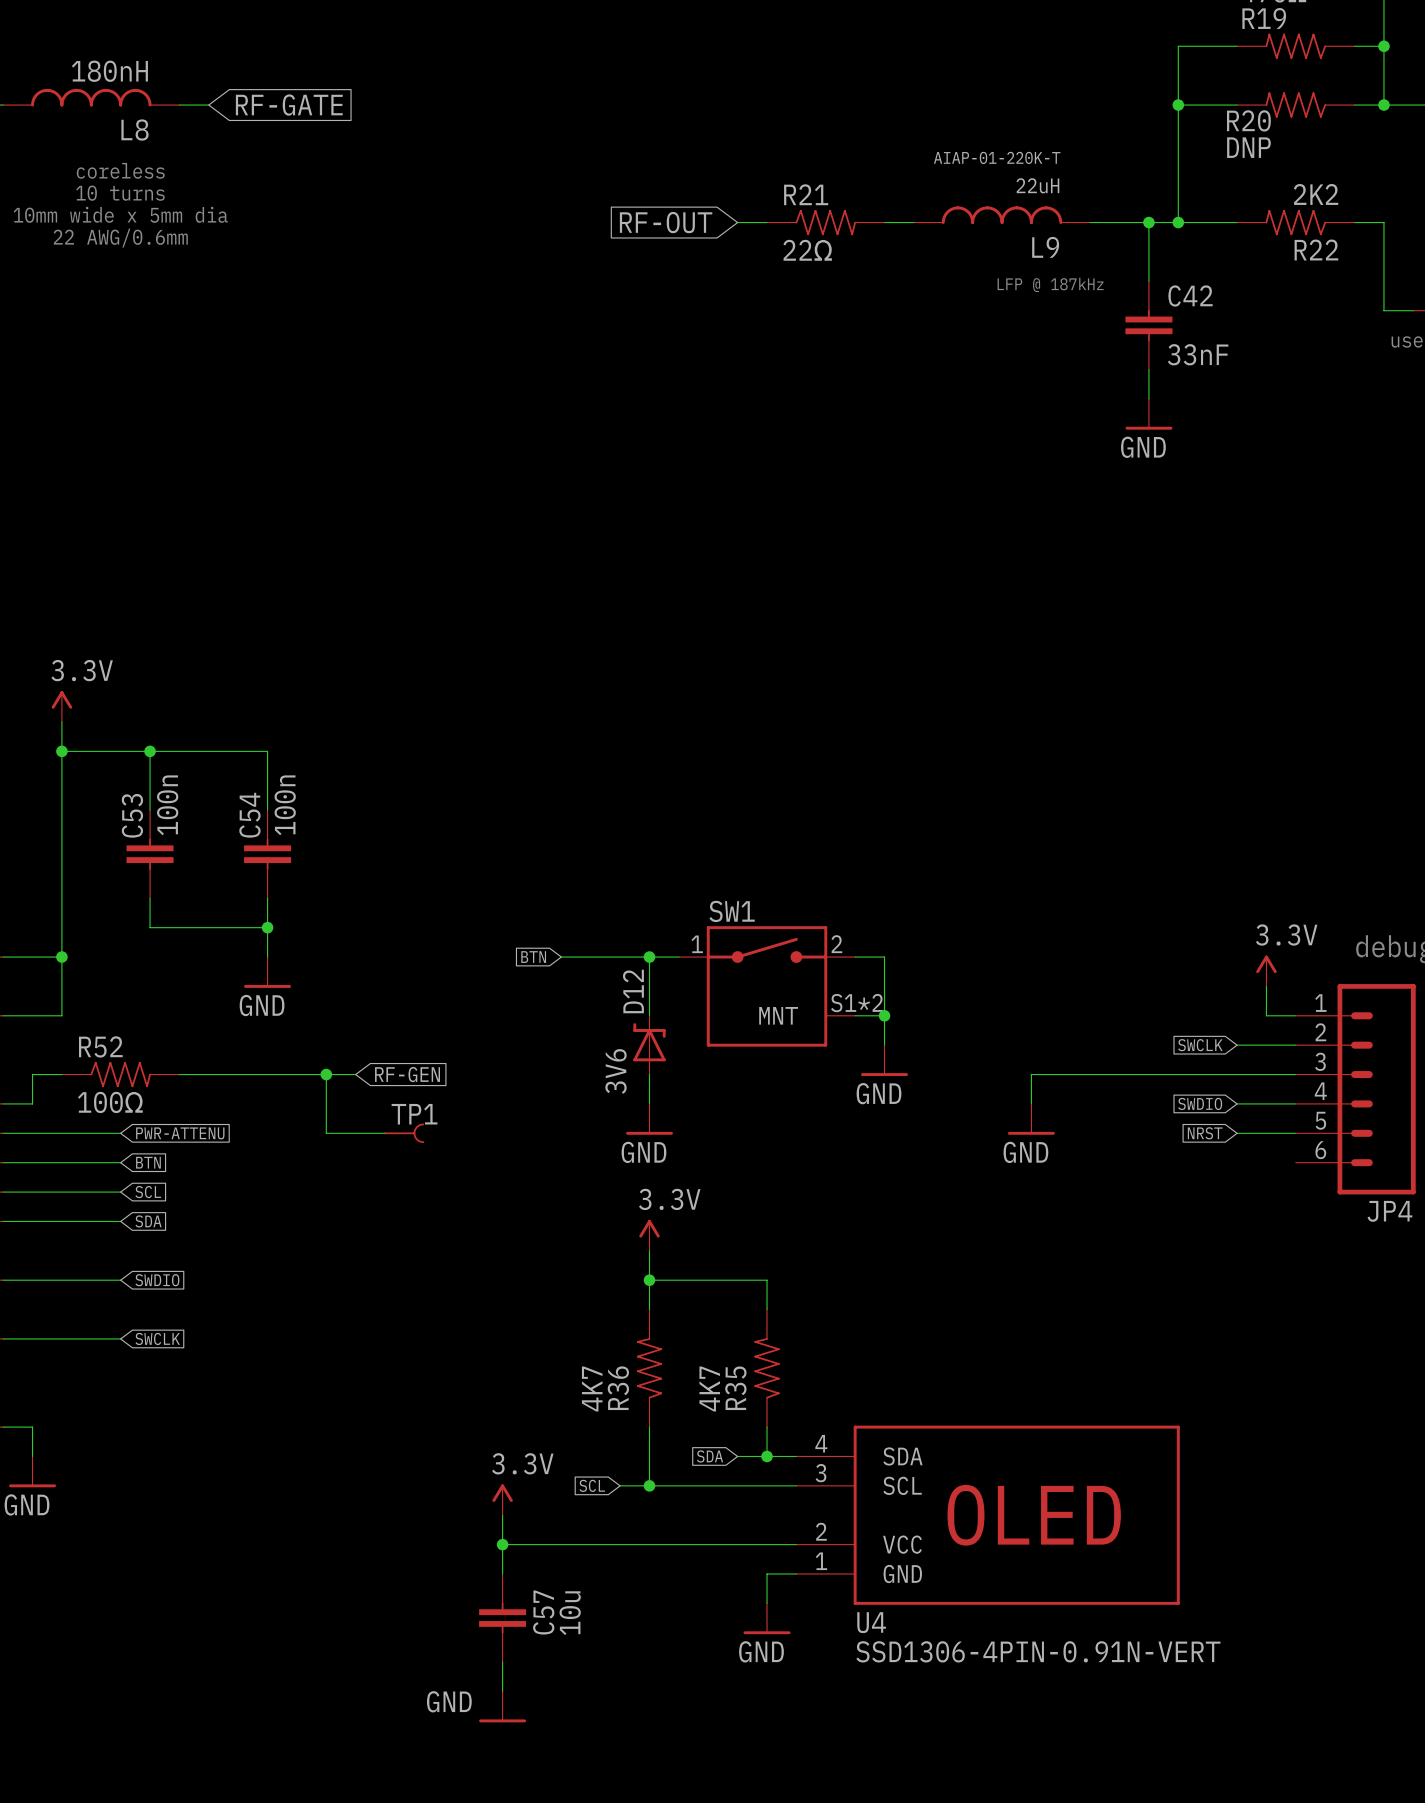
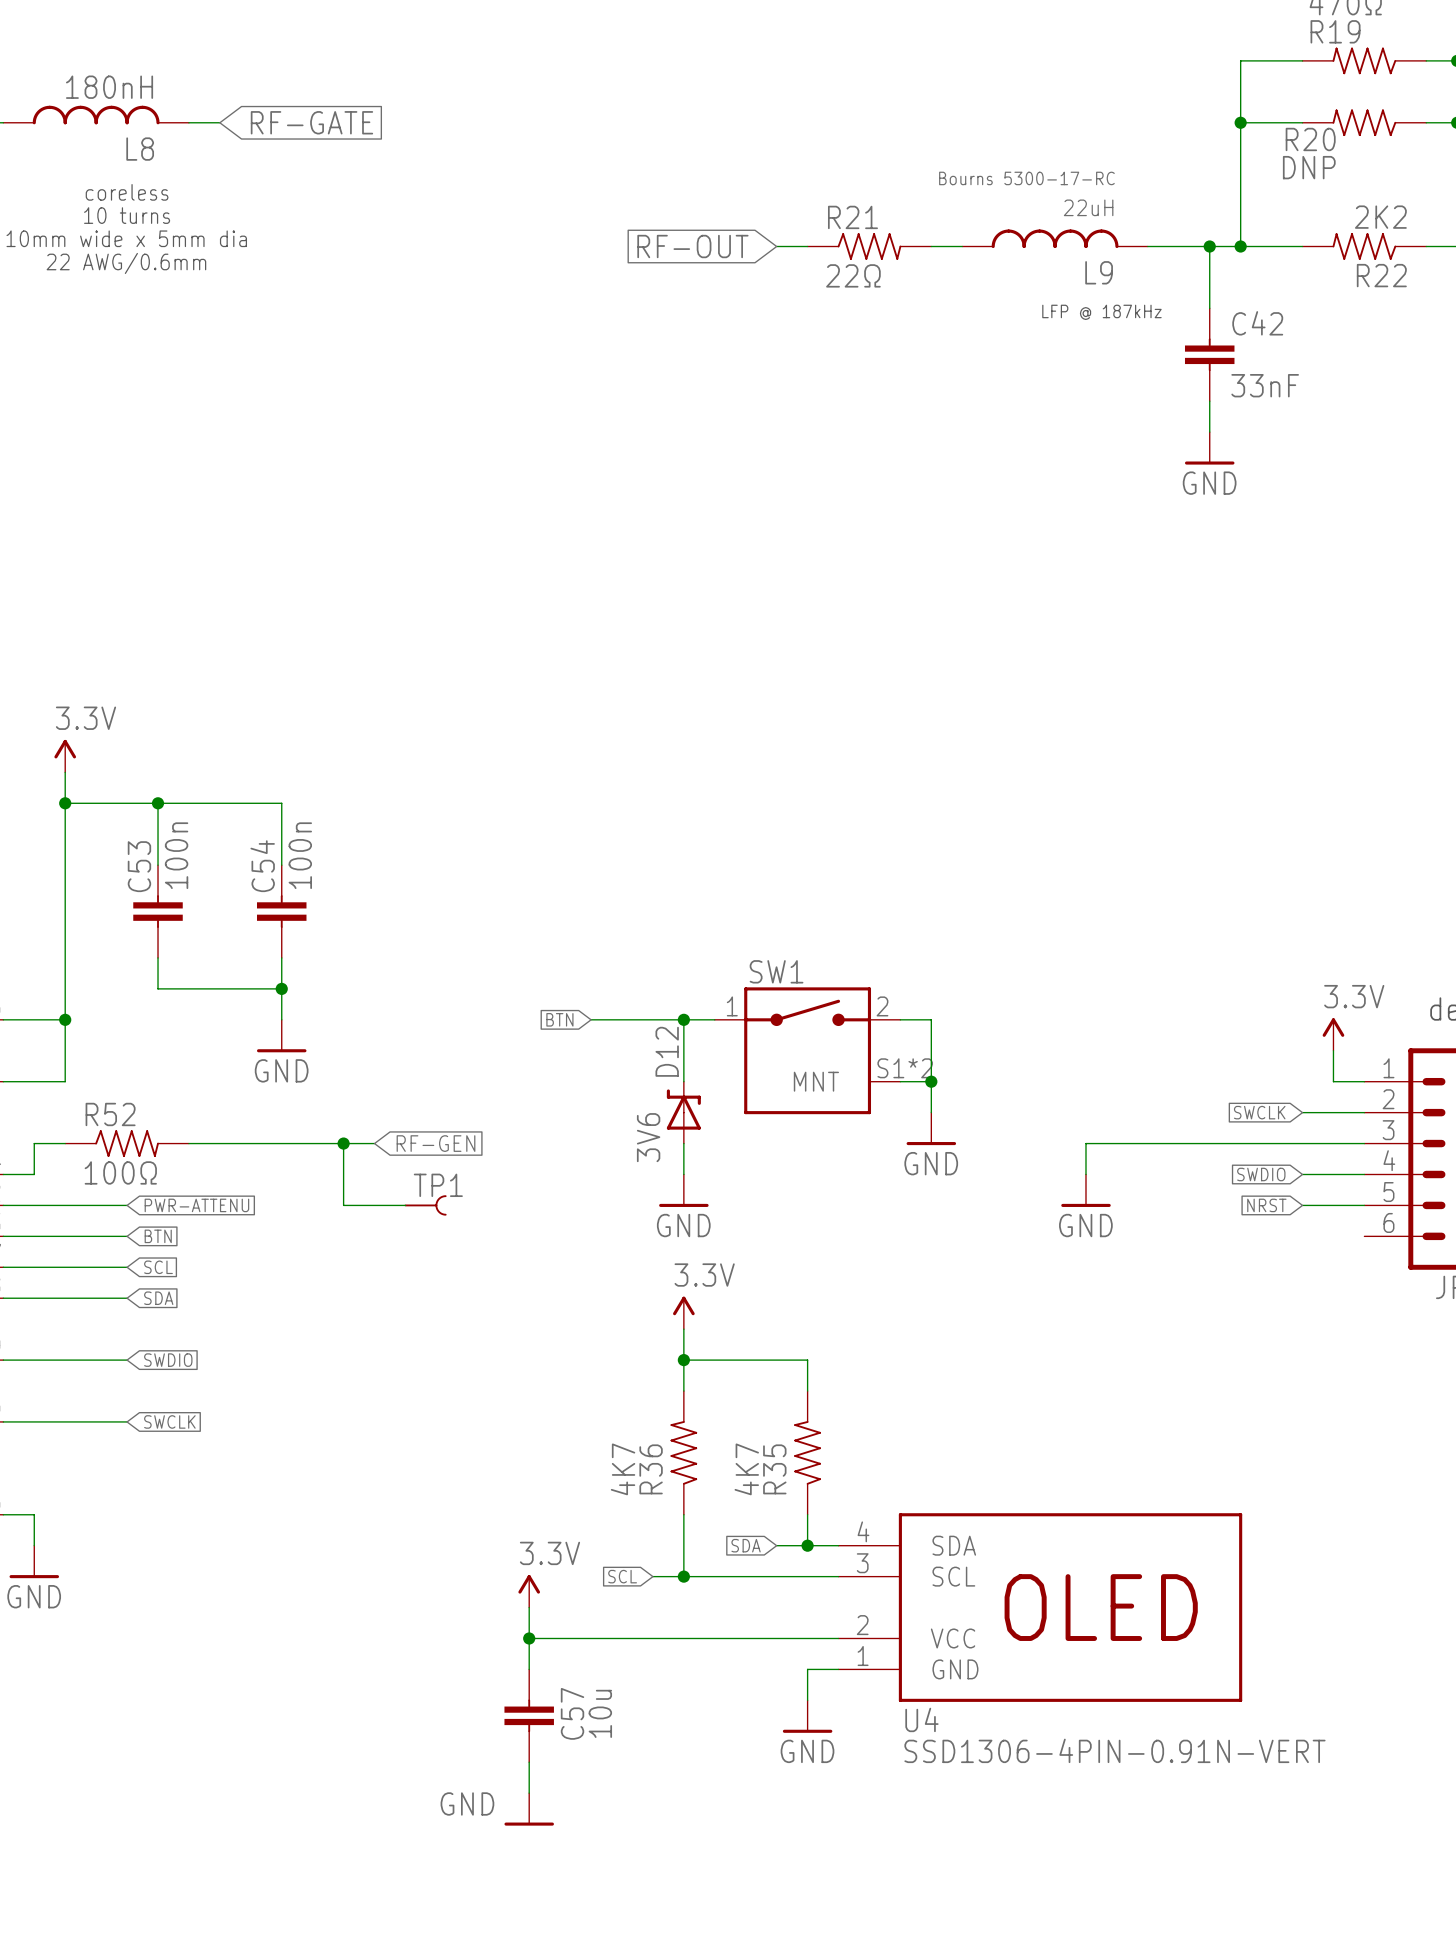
text: AIAP-01-220K-T (997, 157) -> Bourns 5300-17-RC (1026, 178)

